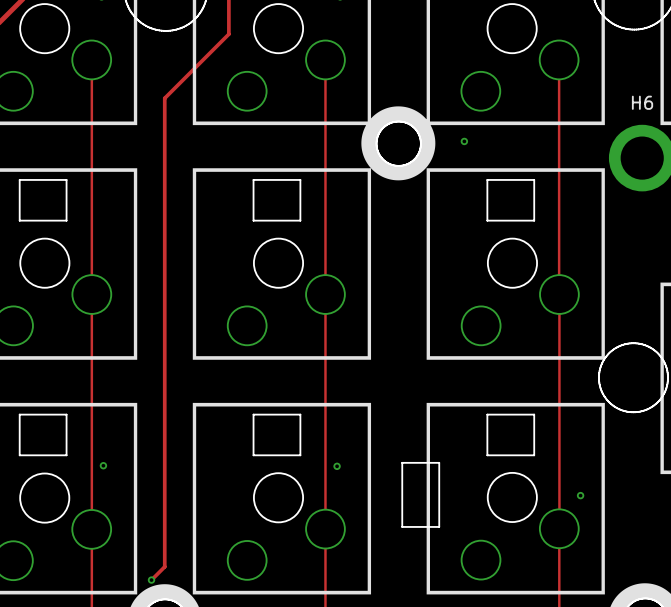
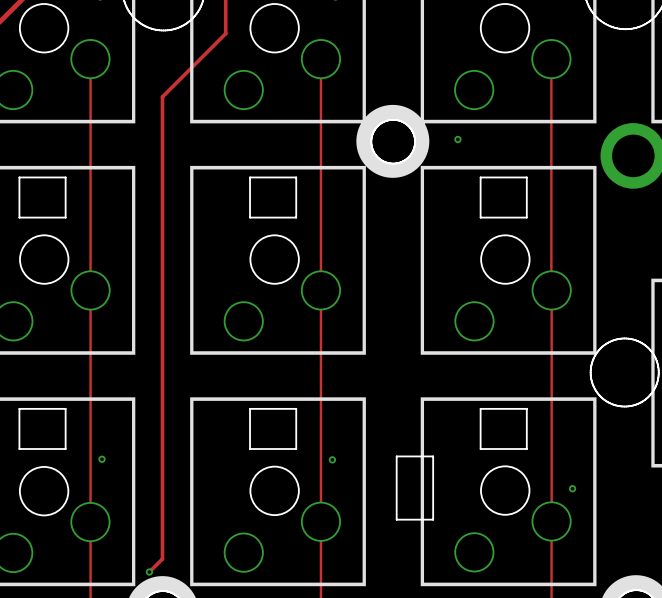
H6 name: H6 (642, 102) -> none

